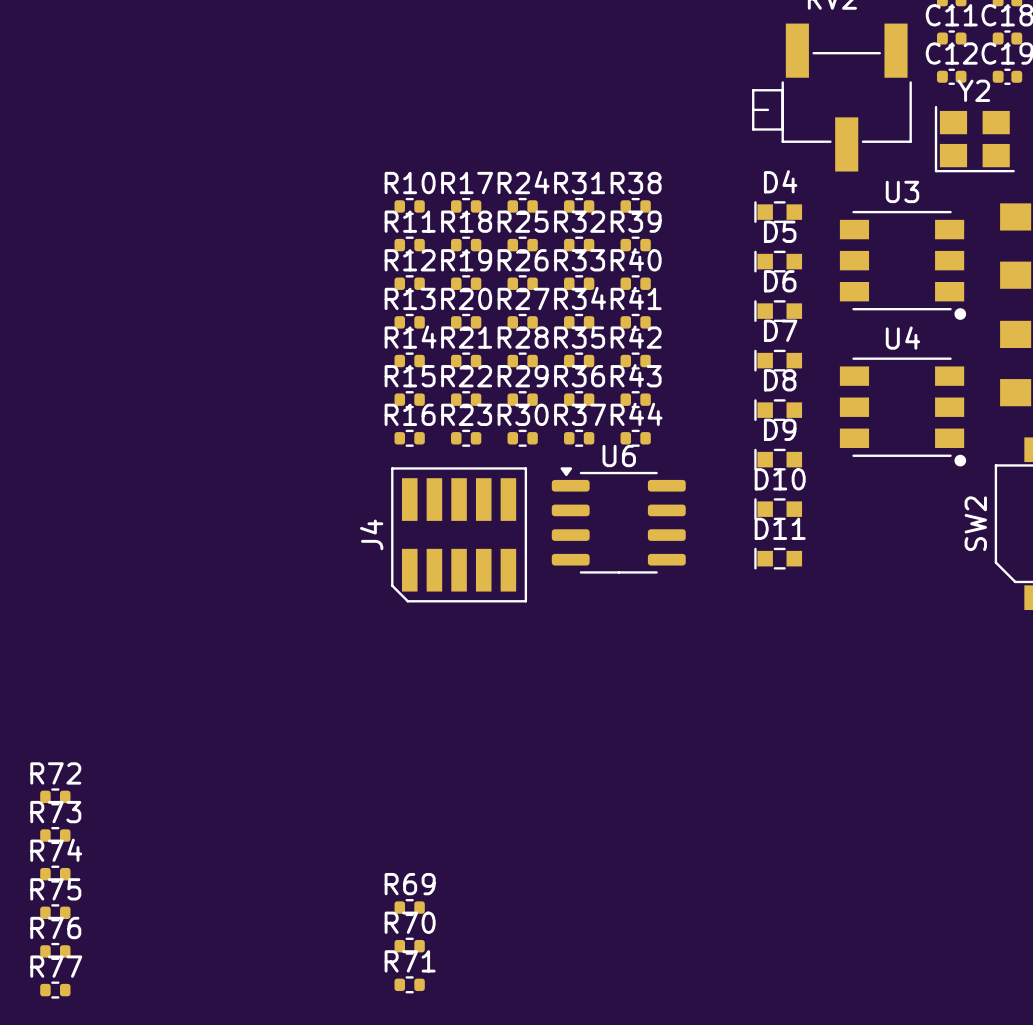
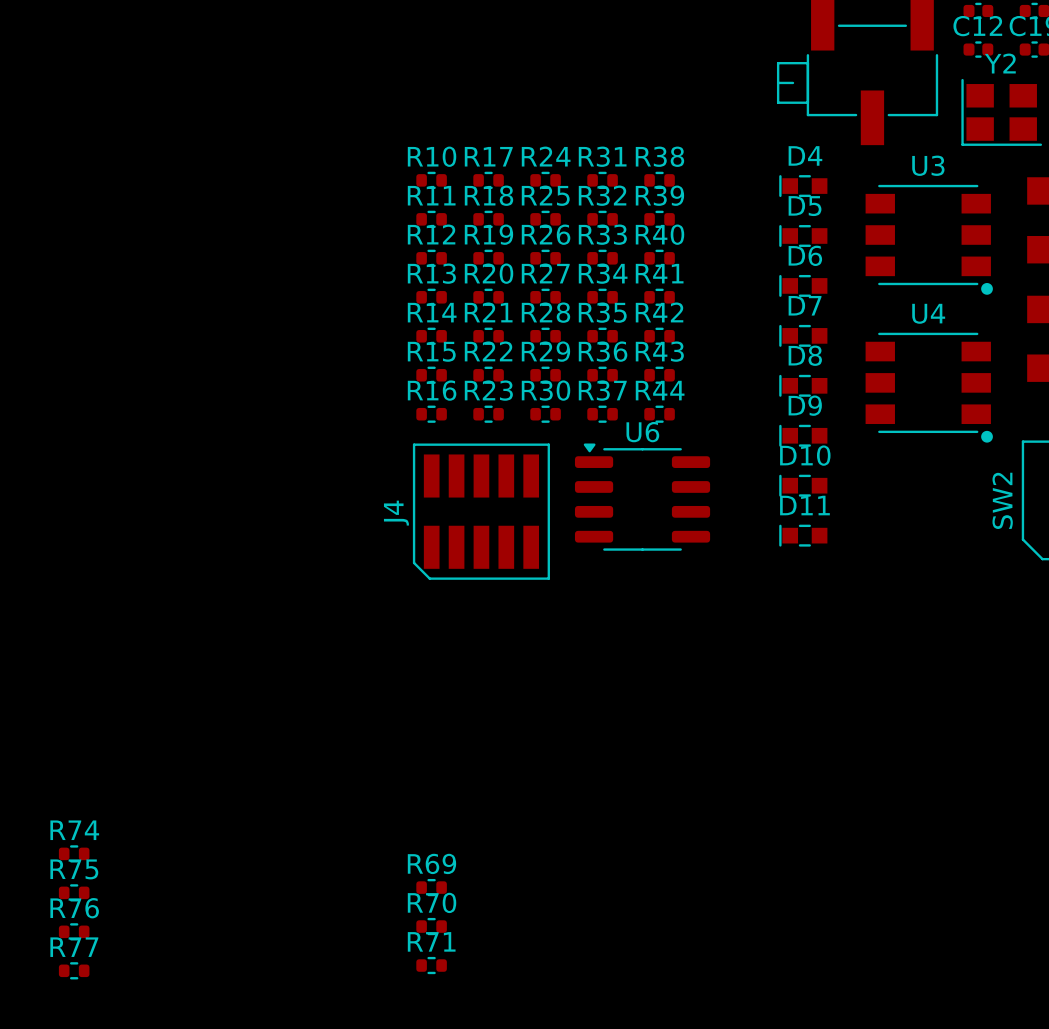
R72: (55, 796) -> none
R73: (55, 835) -> none

